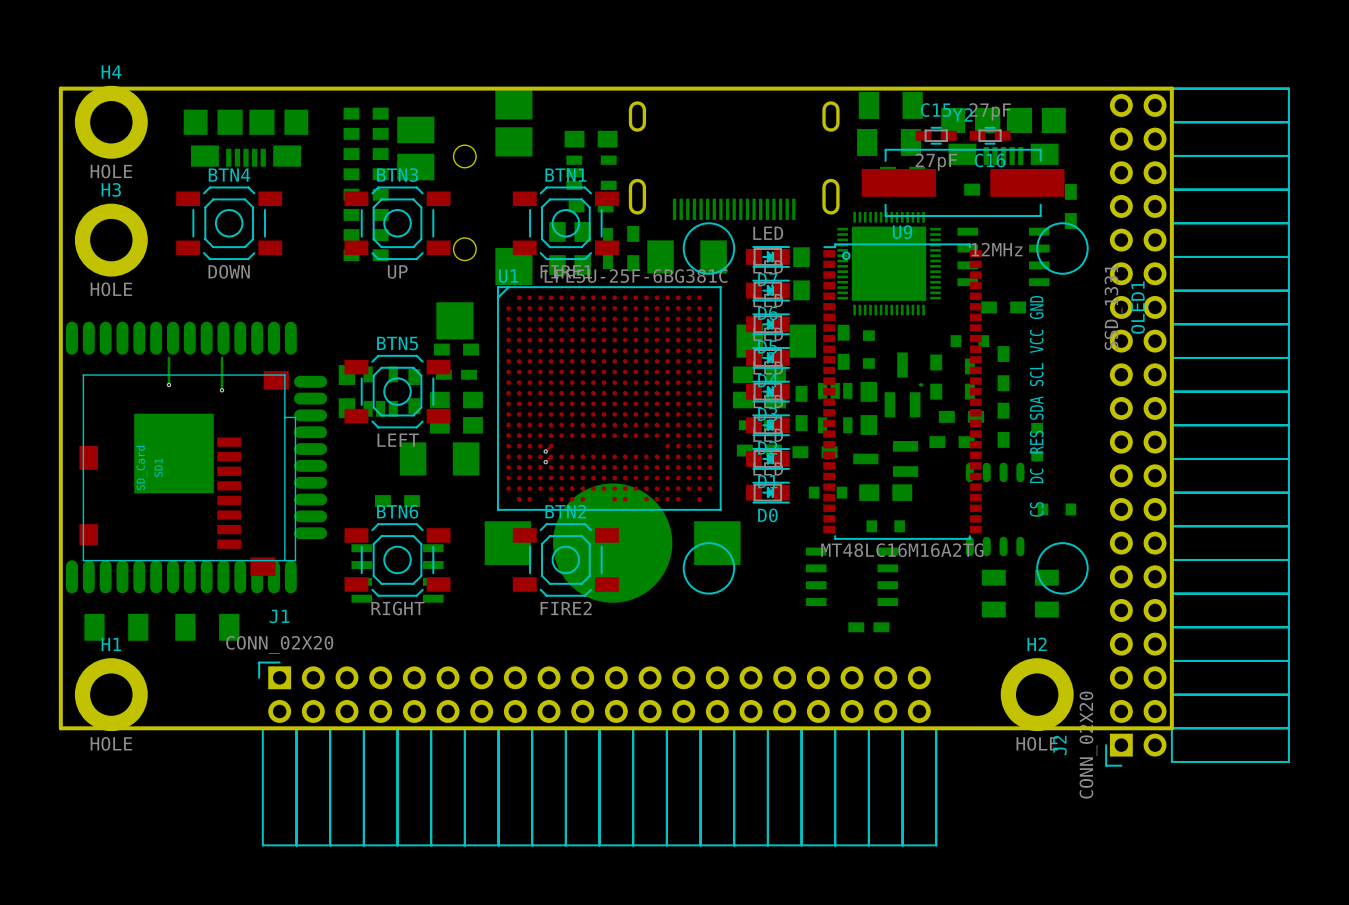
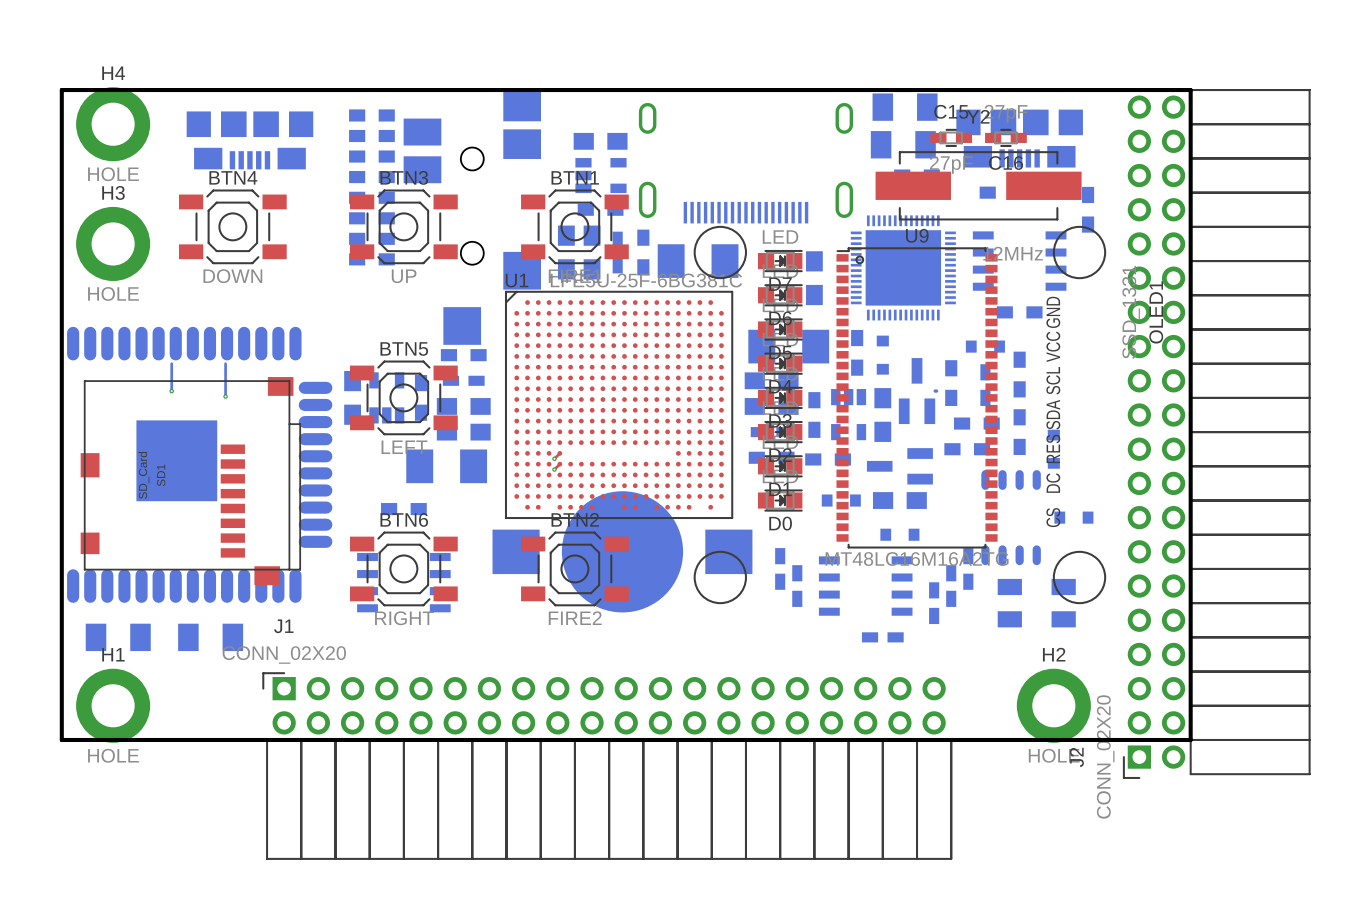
part: none -> (780, 568)
part: none -> (968, 568)
part: none -> (797, 586)
part: none -> (951, 586)
part: none -> (934, 603)

